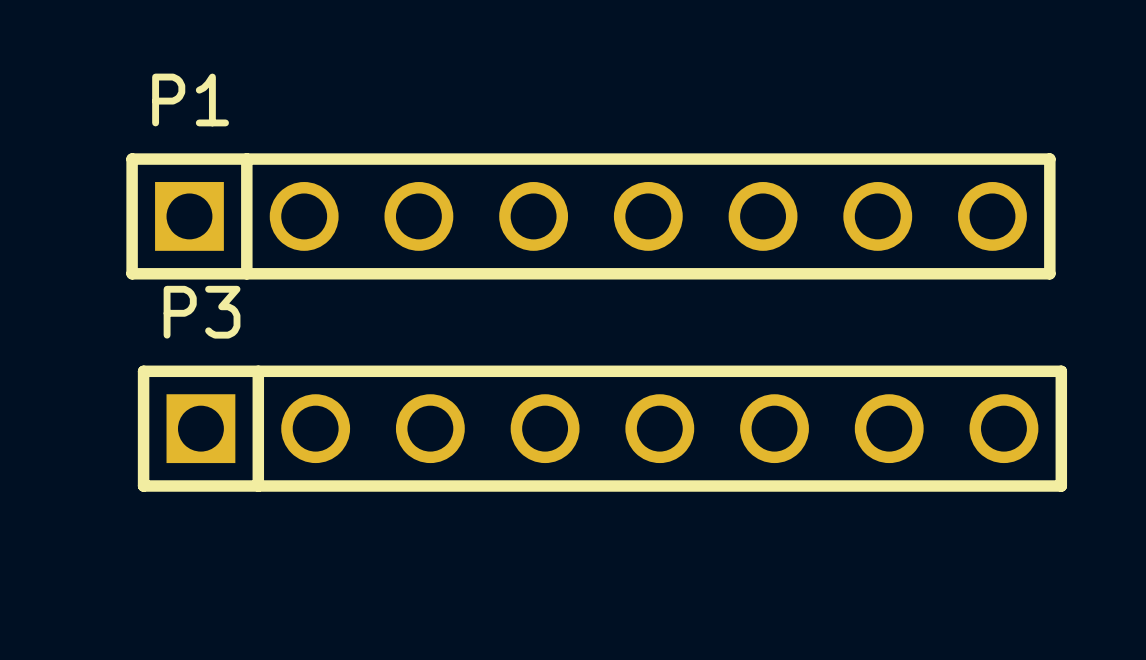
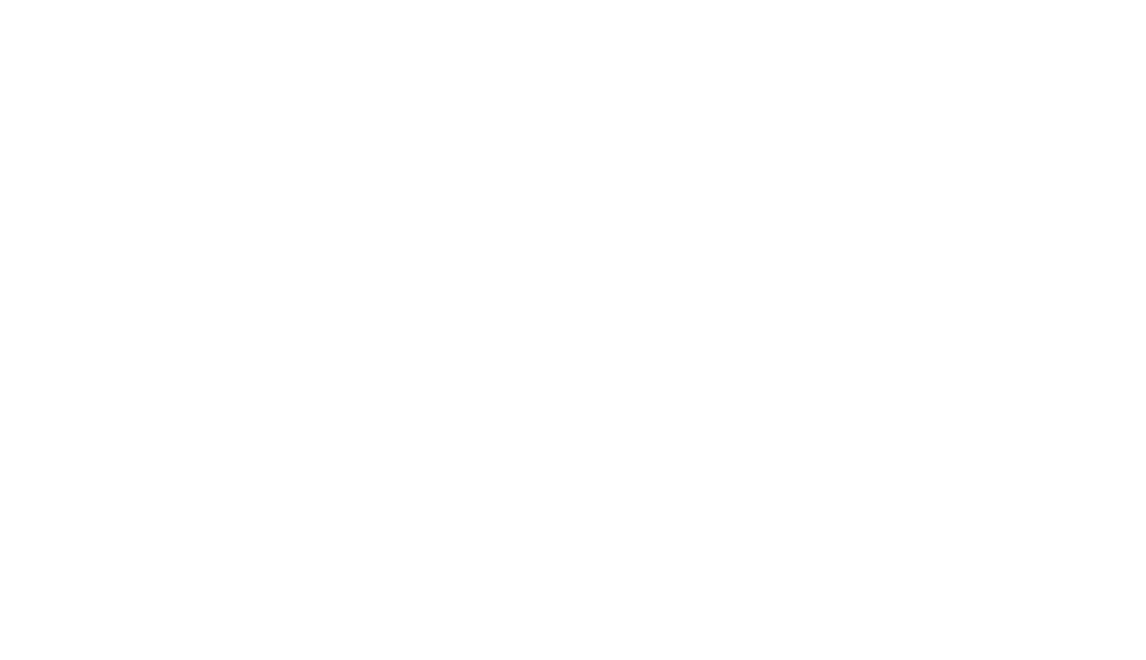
P1: (590, 216) -> none
P3: (602, 428) -> none

